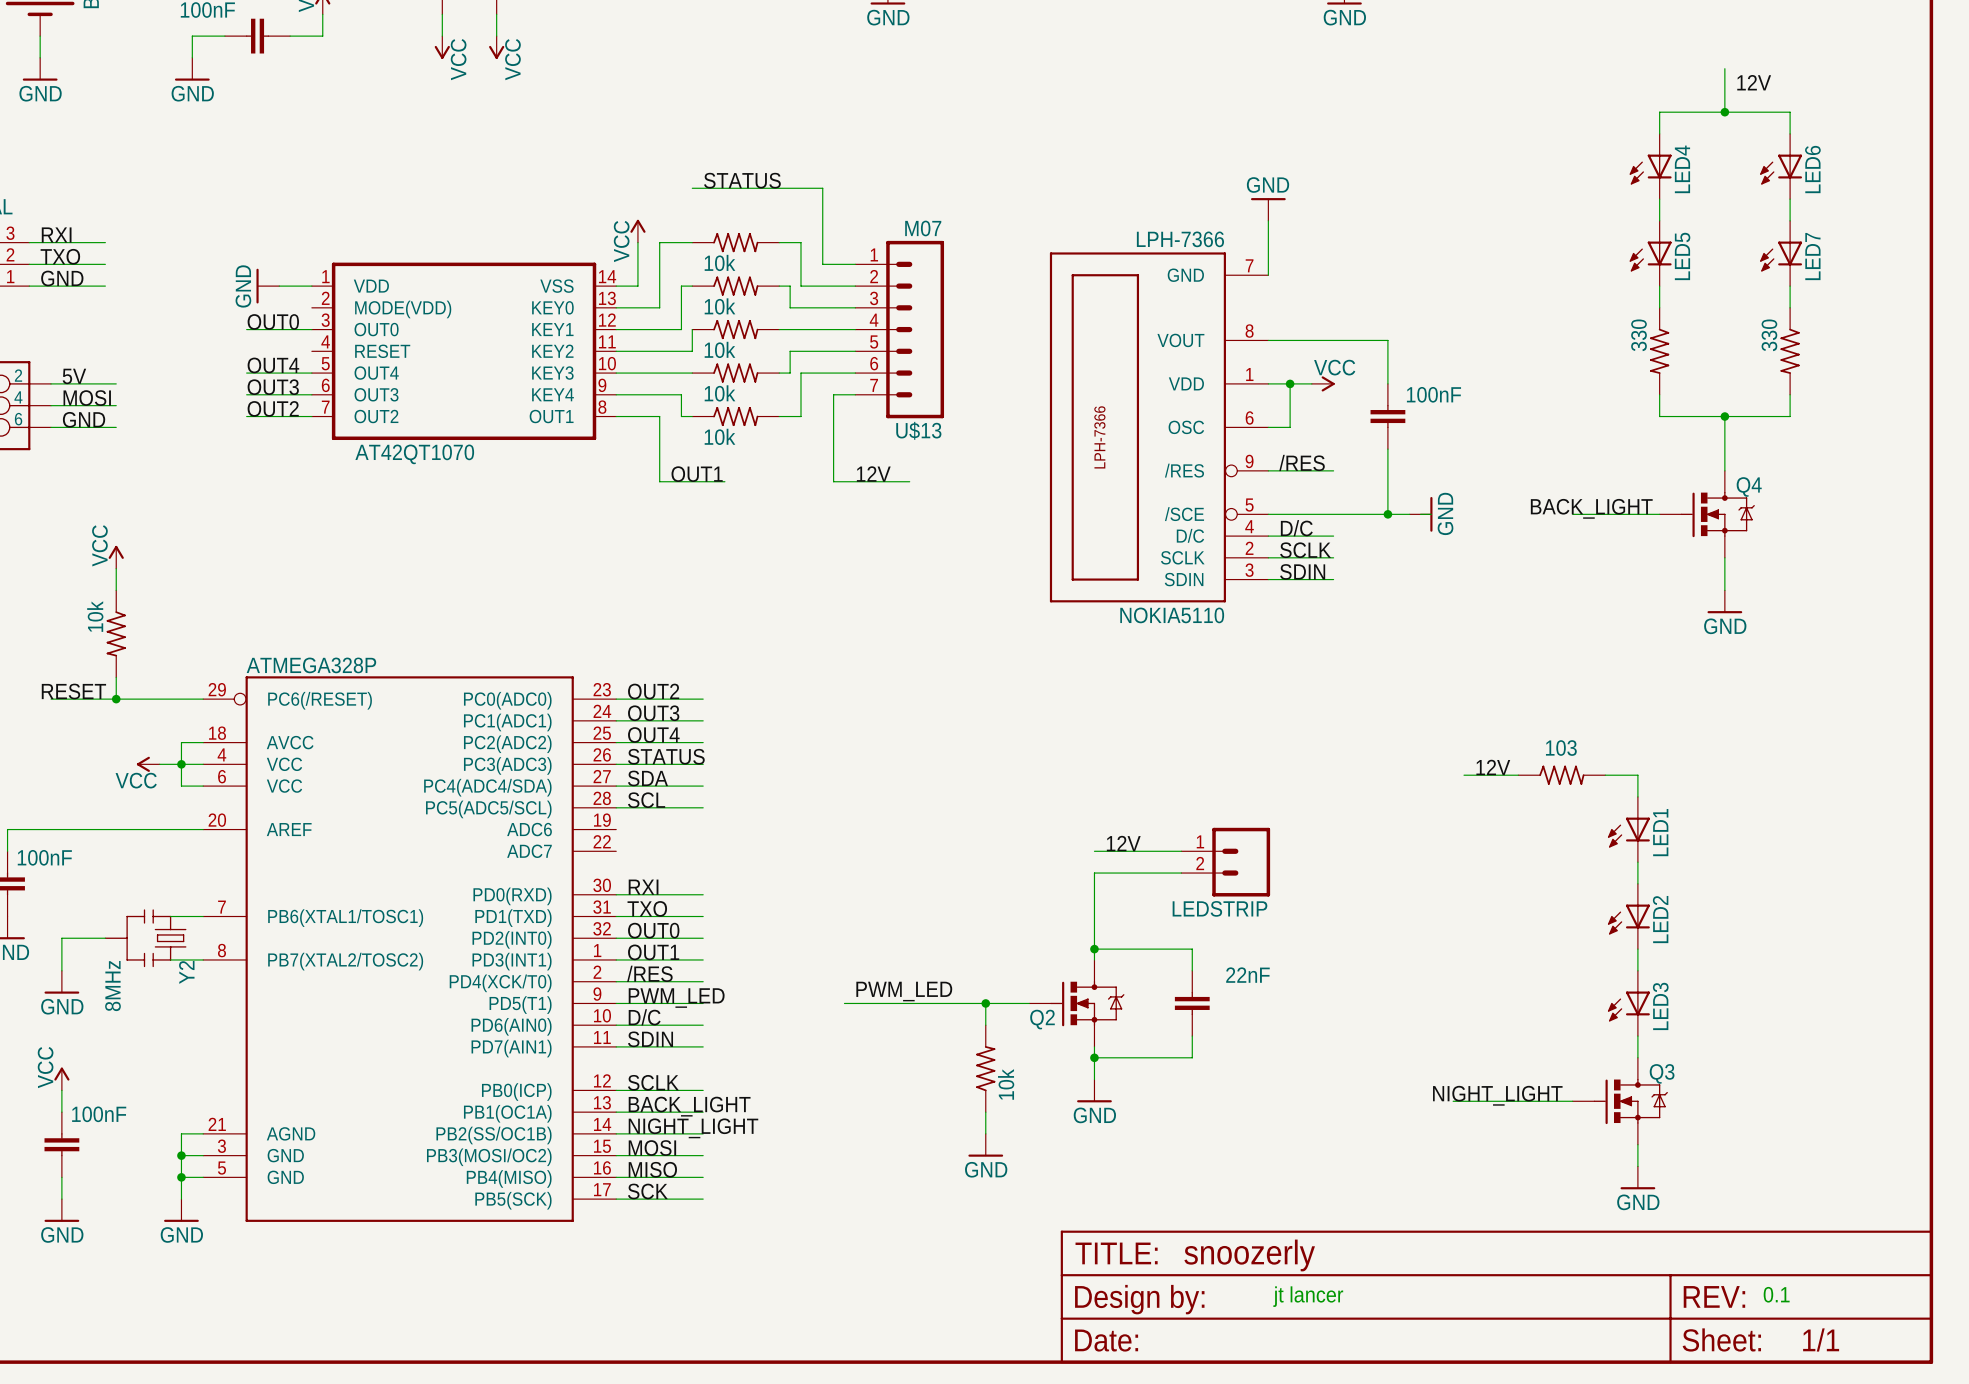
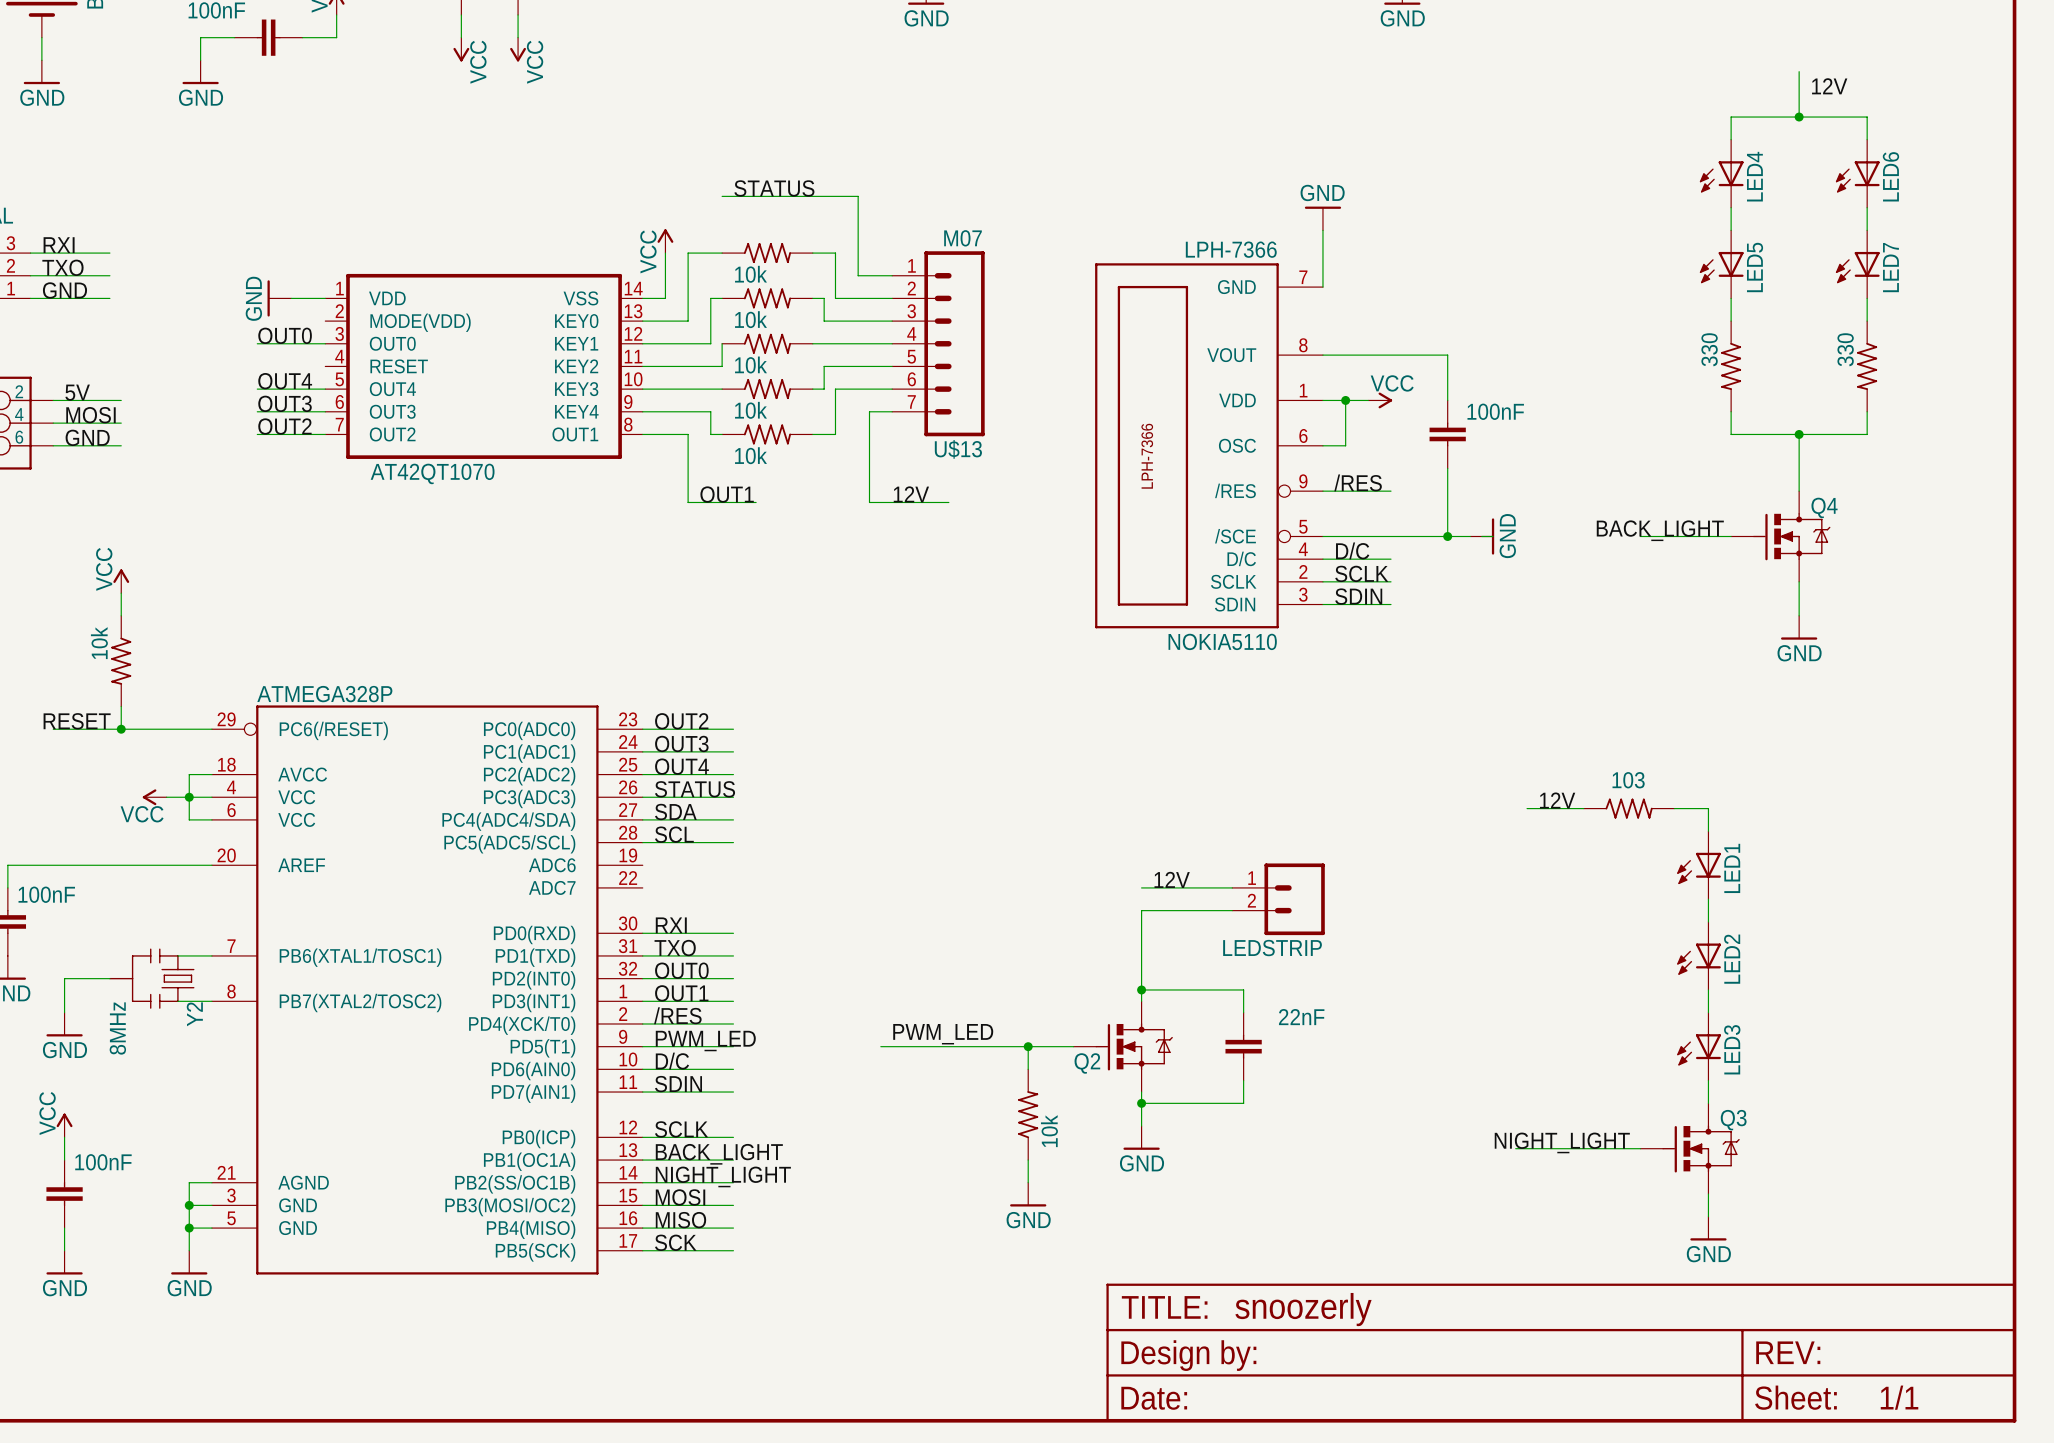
text: 0.1 (1776, 1294) -> none
text: jt lancer (1308, 1296) -> none

